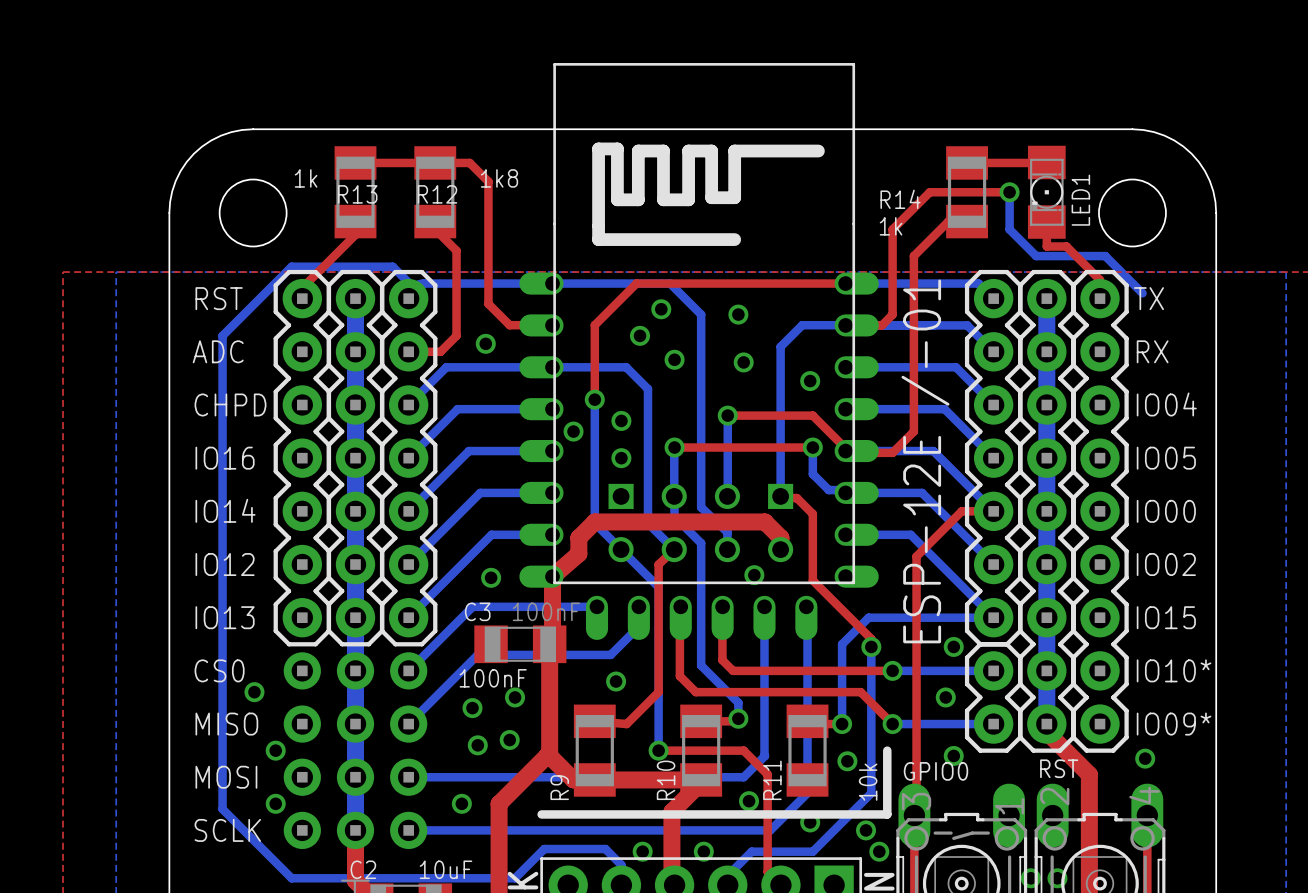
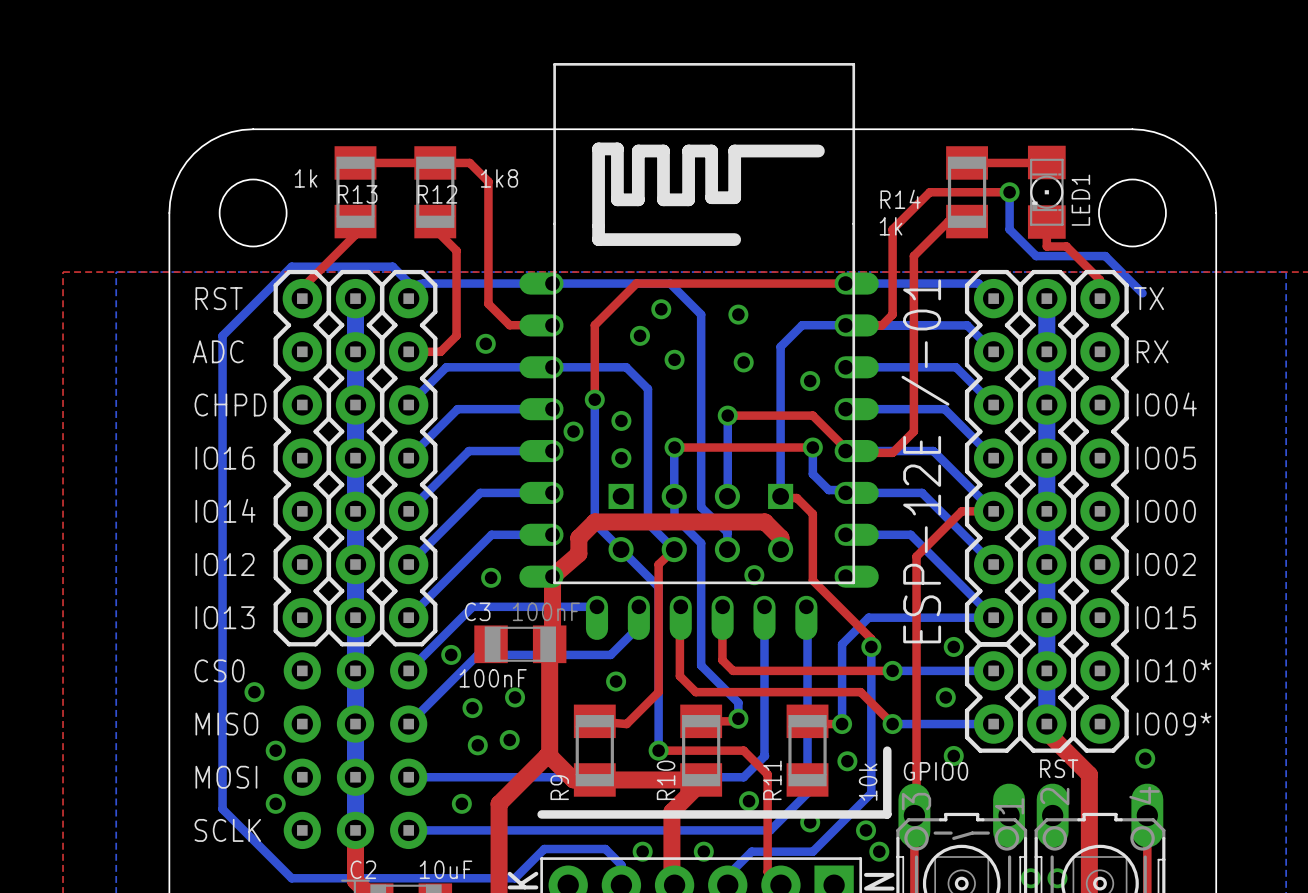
via: none -> (451, 654)

